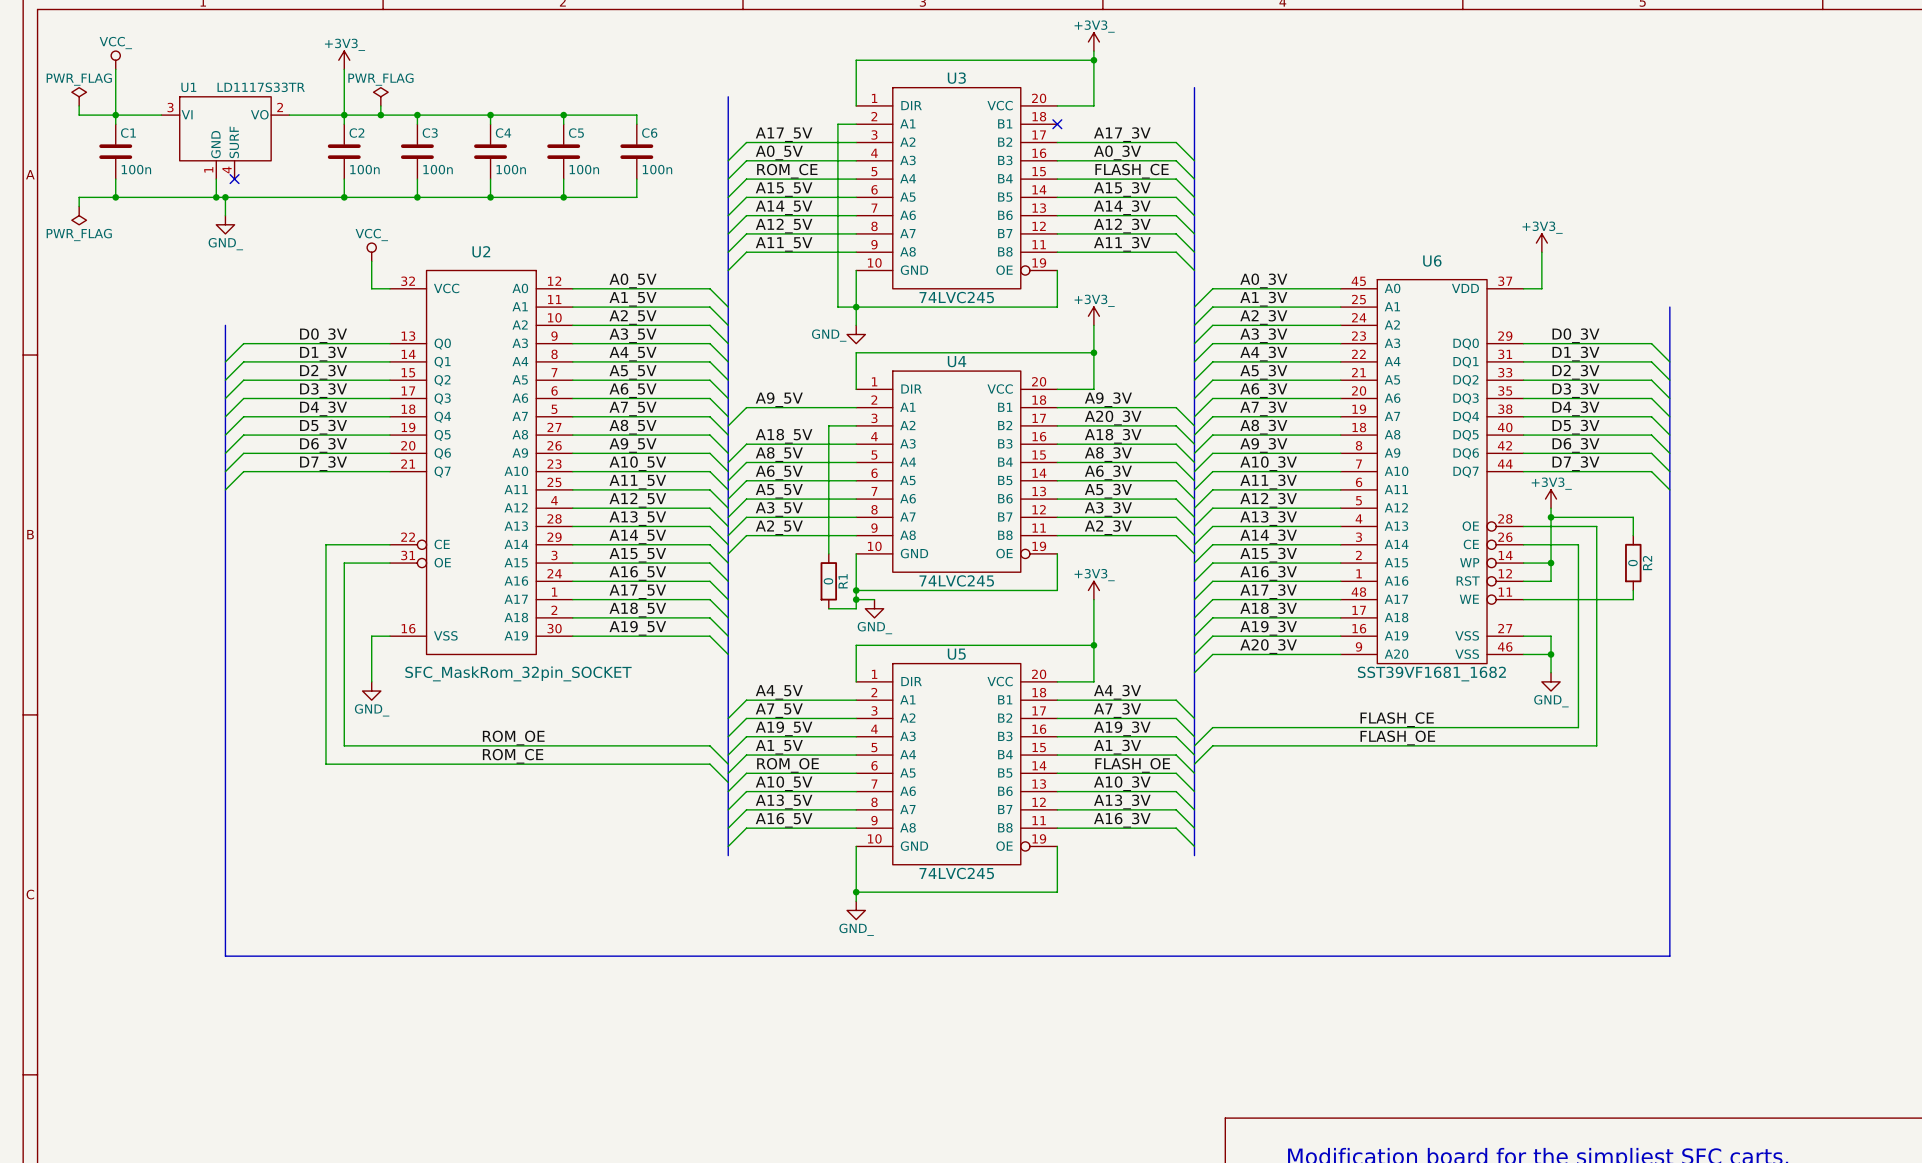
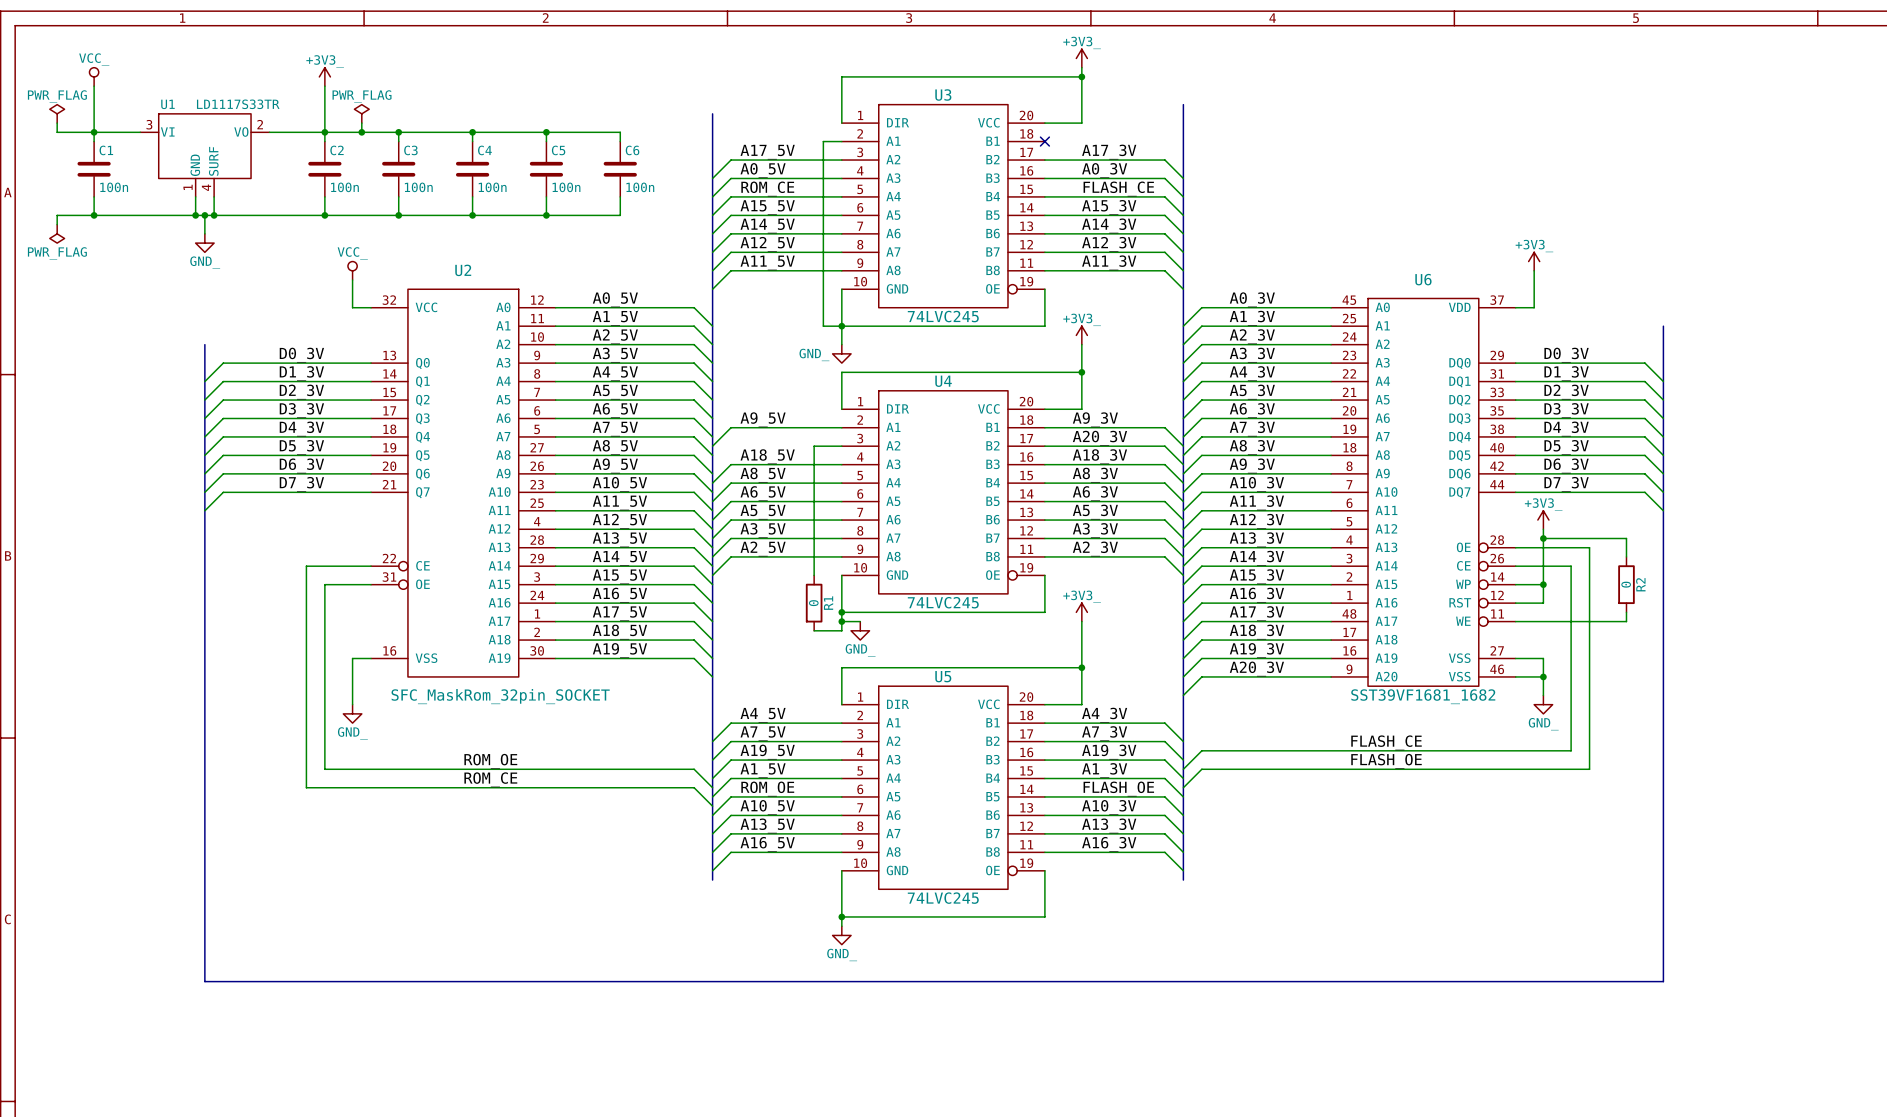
wire: none -> (214, 196) (214, 215)
no-connect mark: (234, 179) -> none
junction: none -> (214, 215)

